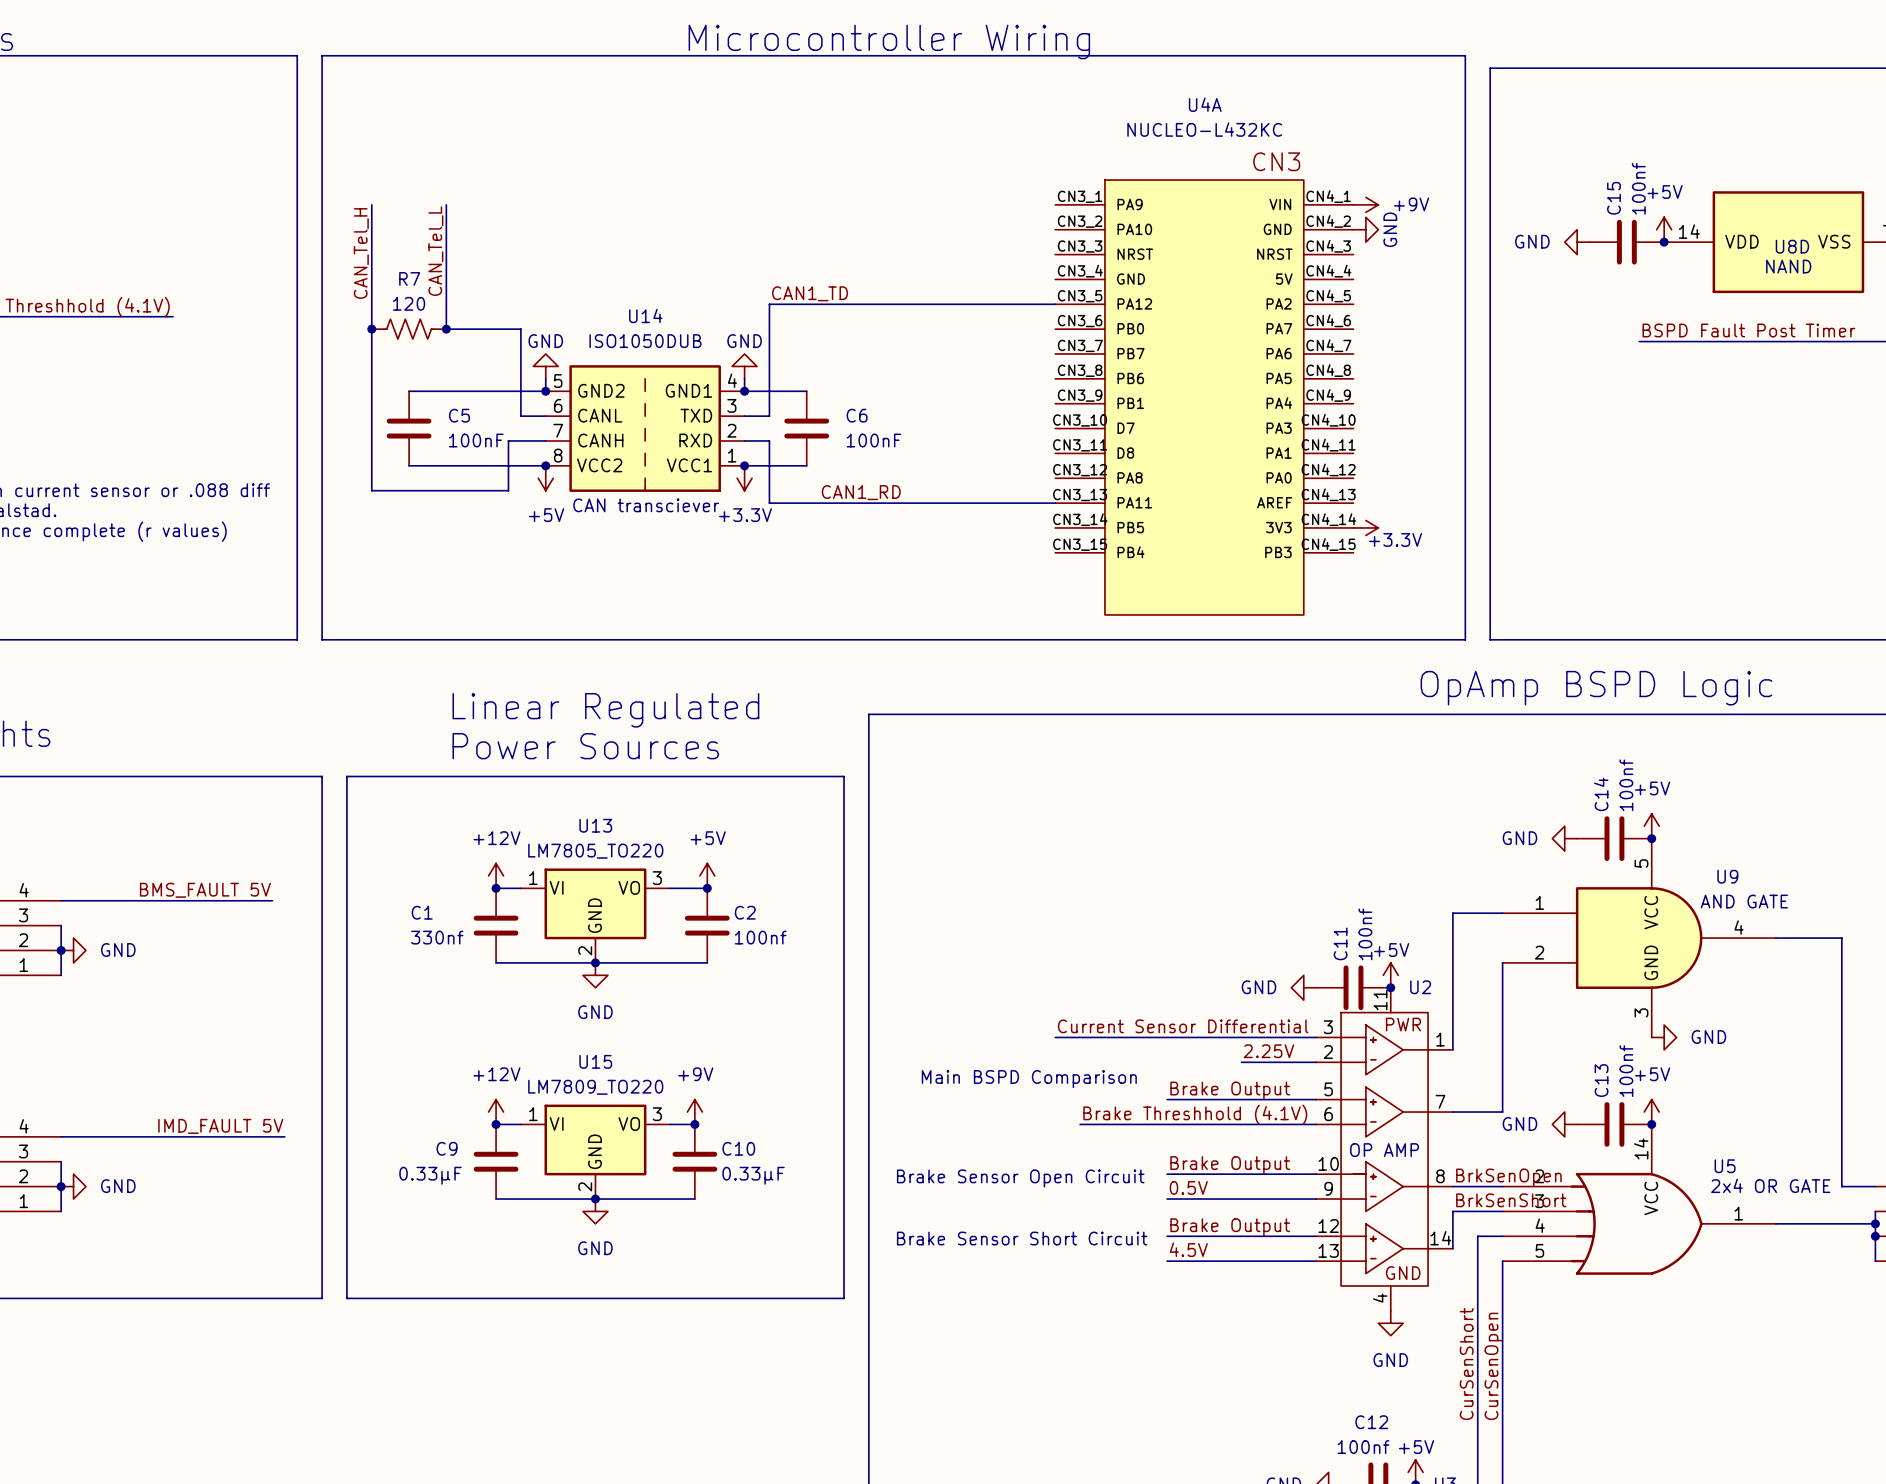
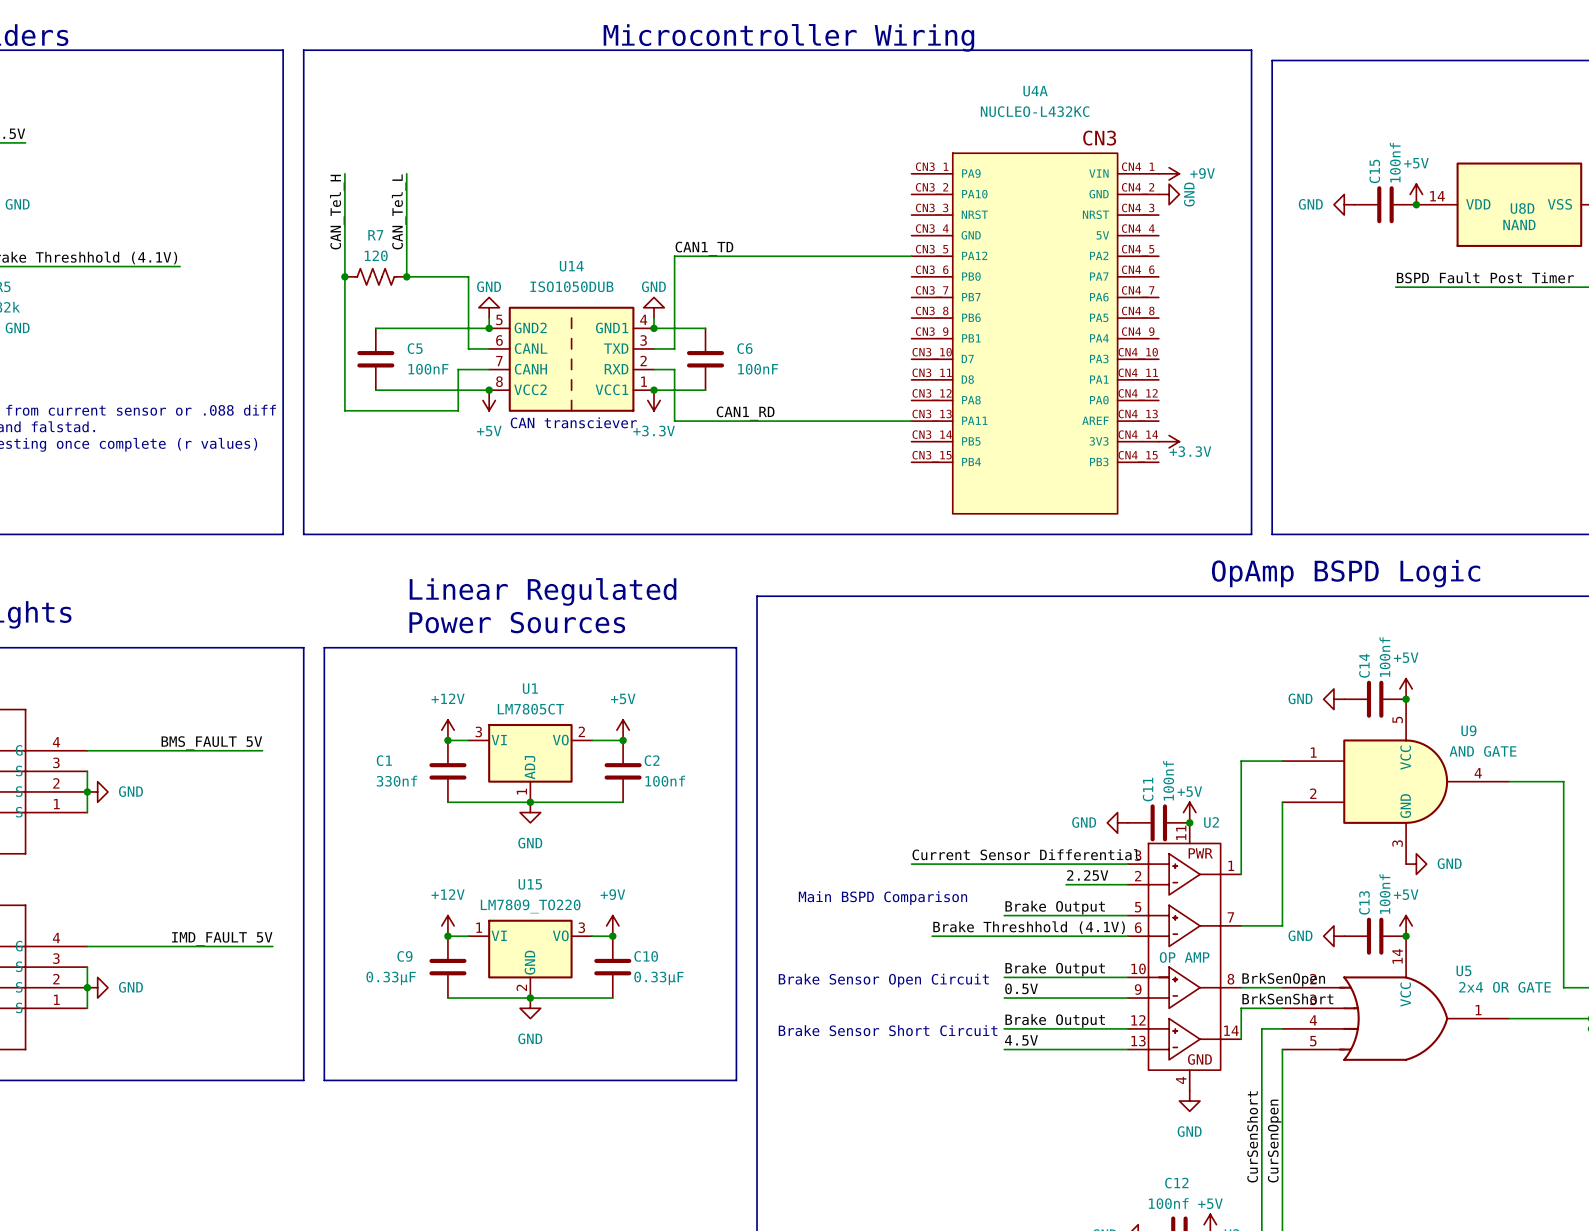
U13 name: U13 (595, 825) -> U1 (530, 688)
U13 value: LM7805_TO220 (595, 851) -> LM7805CT (530, 709)
U13 pin number: 1 (533, 878) -> 3 (478, 731)
U13 pin number: 3 (657, 878) -> 2 (581, 731)
U13 pin name: GND (595, 915) -> ADJ (530, 767)
U13 pin number: 2 (585, 950) -> 1 (521, 791)

